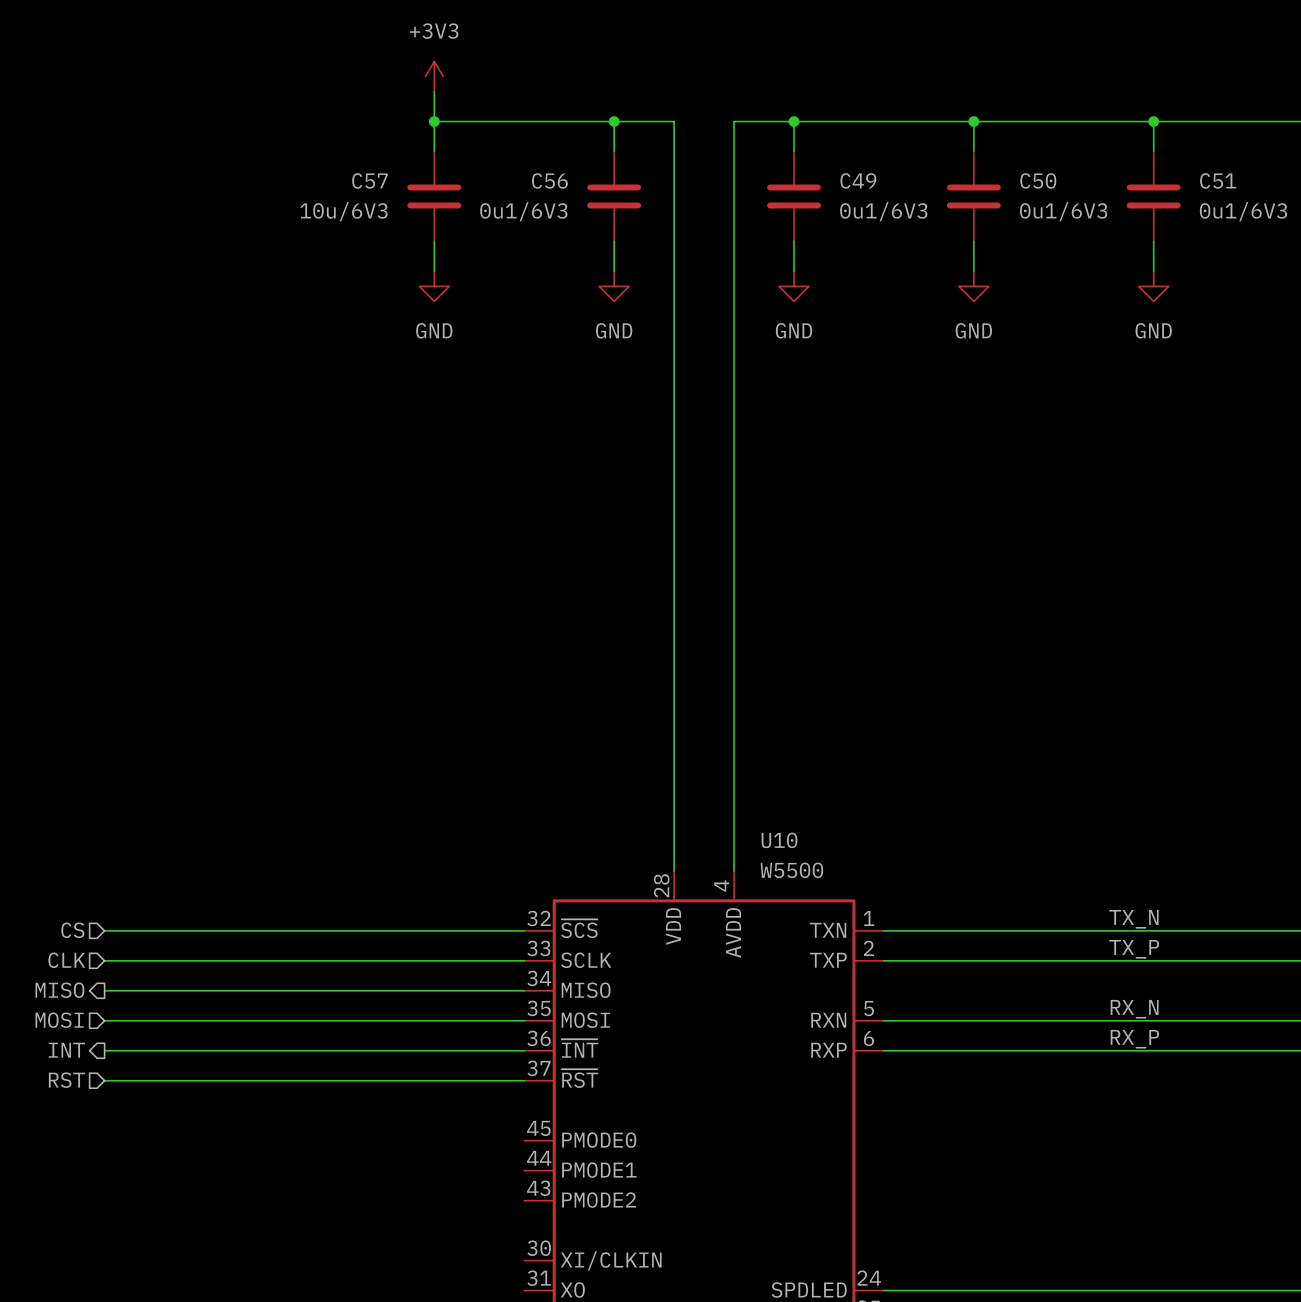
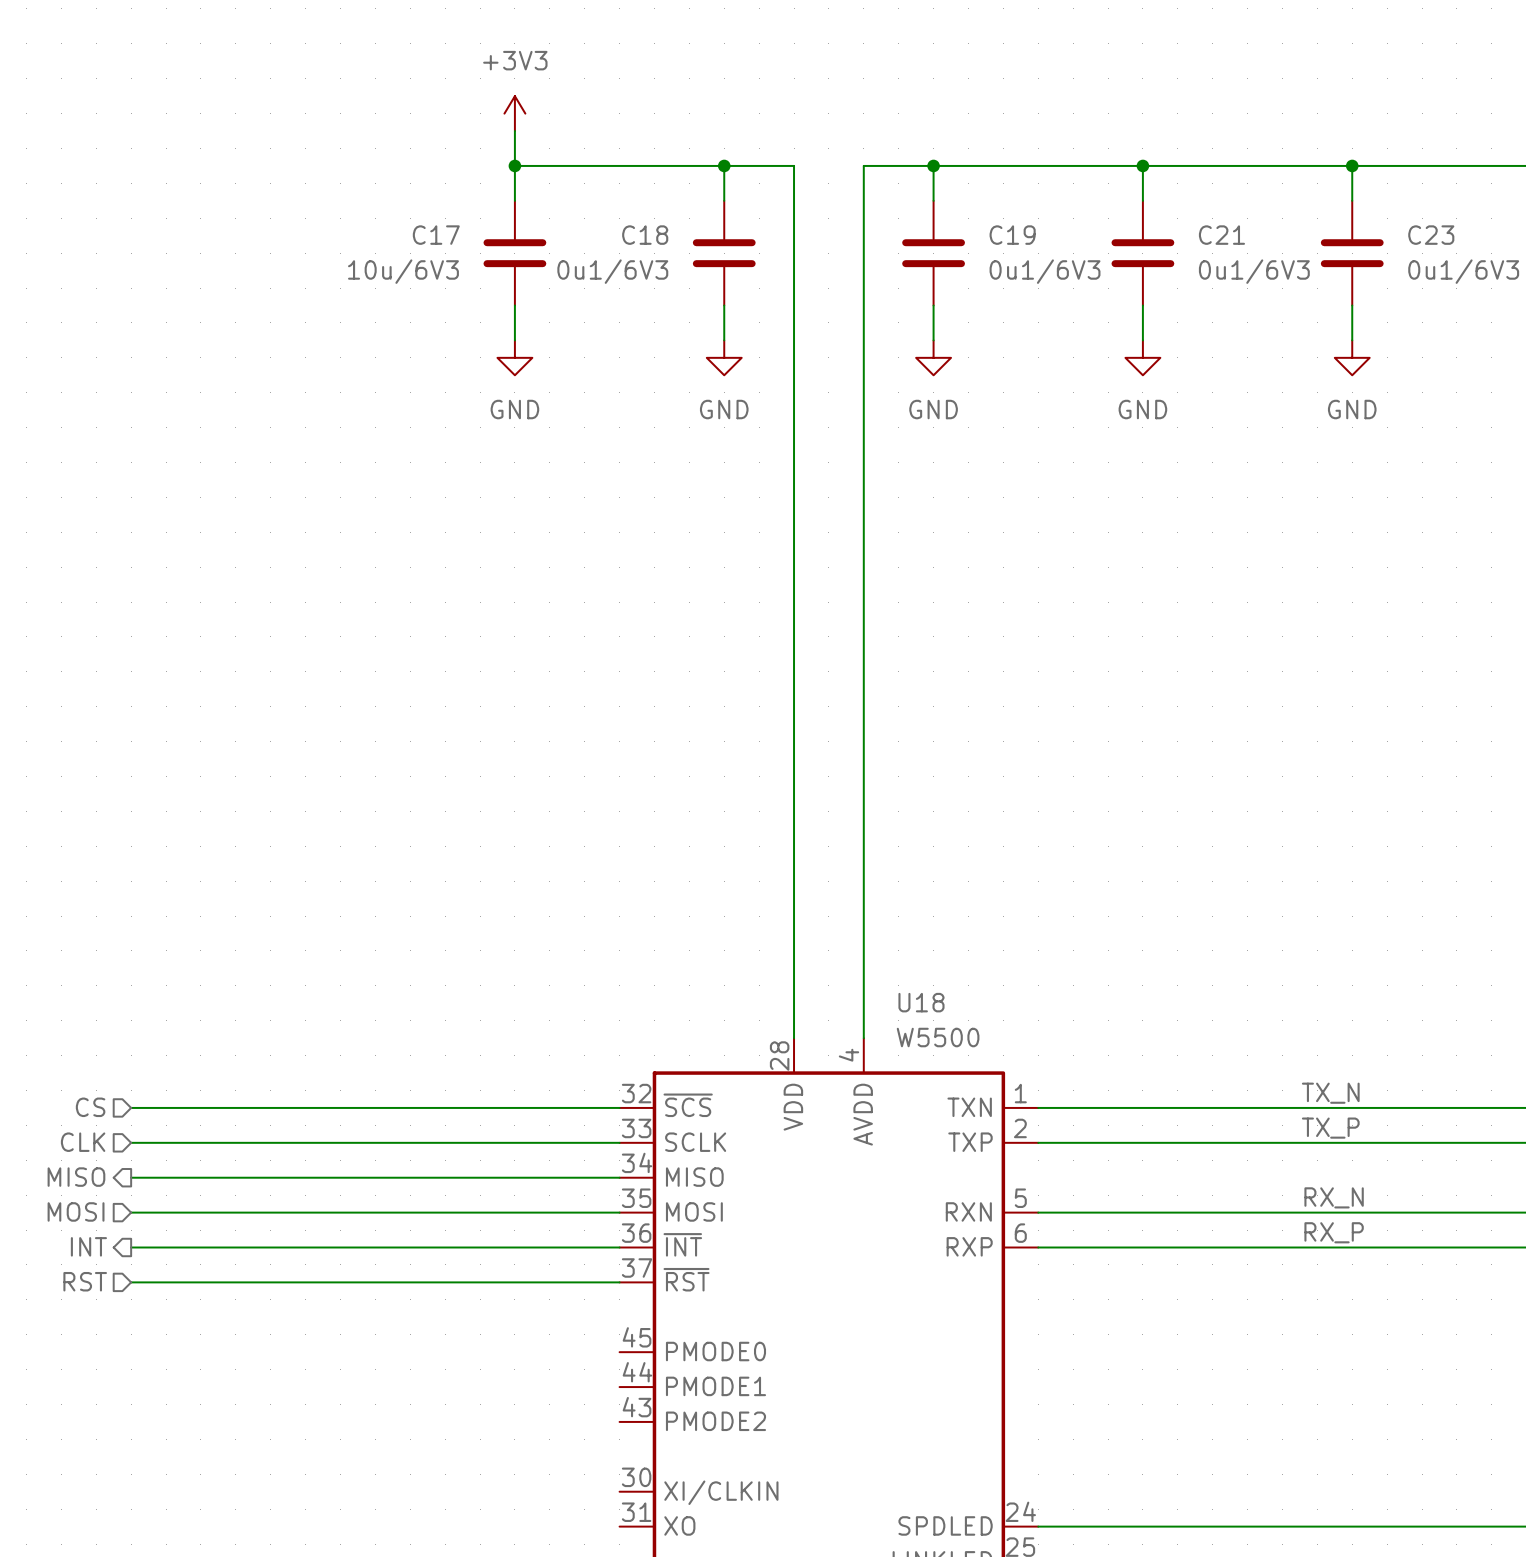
C57 name: C57 (370, 180) -> C17 (436, 235)
C56 name: C56 (549, 180) -> C18 (645, 235)
C49 name: C49 (858, 180) -> C19 (1012, 235)
C50 name: C50 (1038, 180) -> C21 (1221, 235)
C51 name: C51 (1218, 180) -> C23 (1431, 235)
U10 name: U10 (779, 840) -> U18 (921, 1002)

